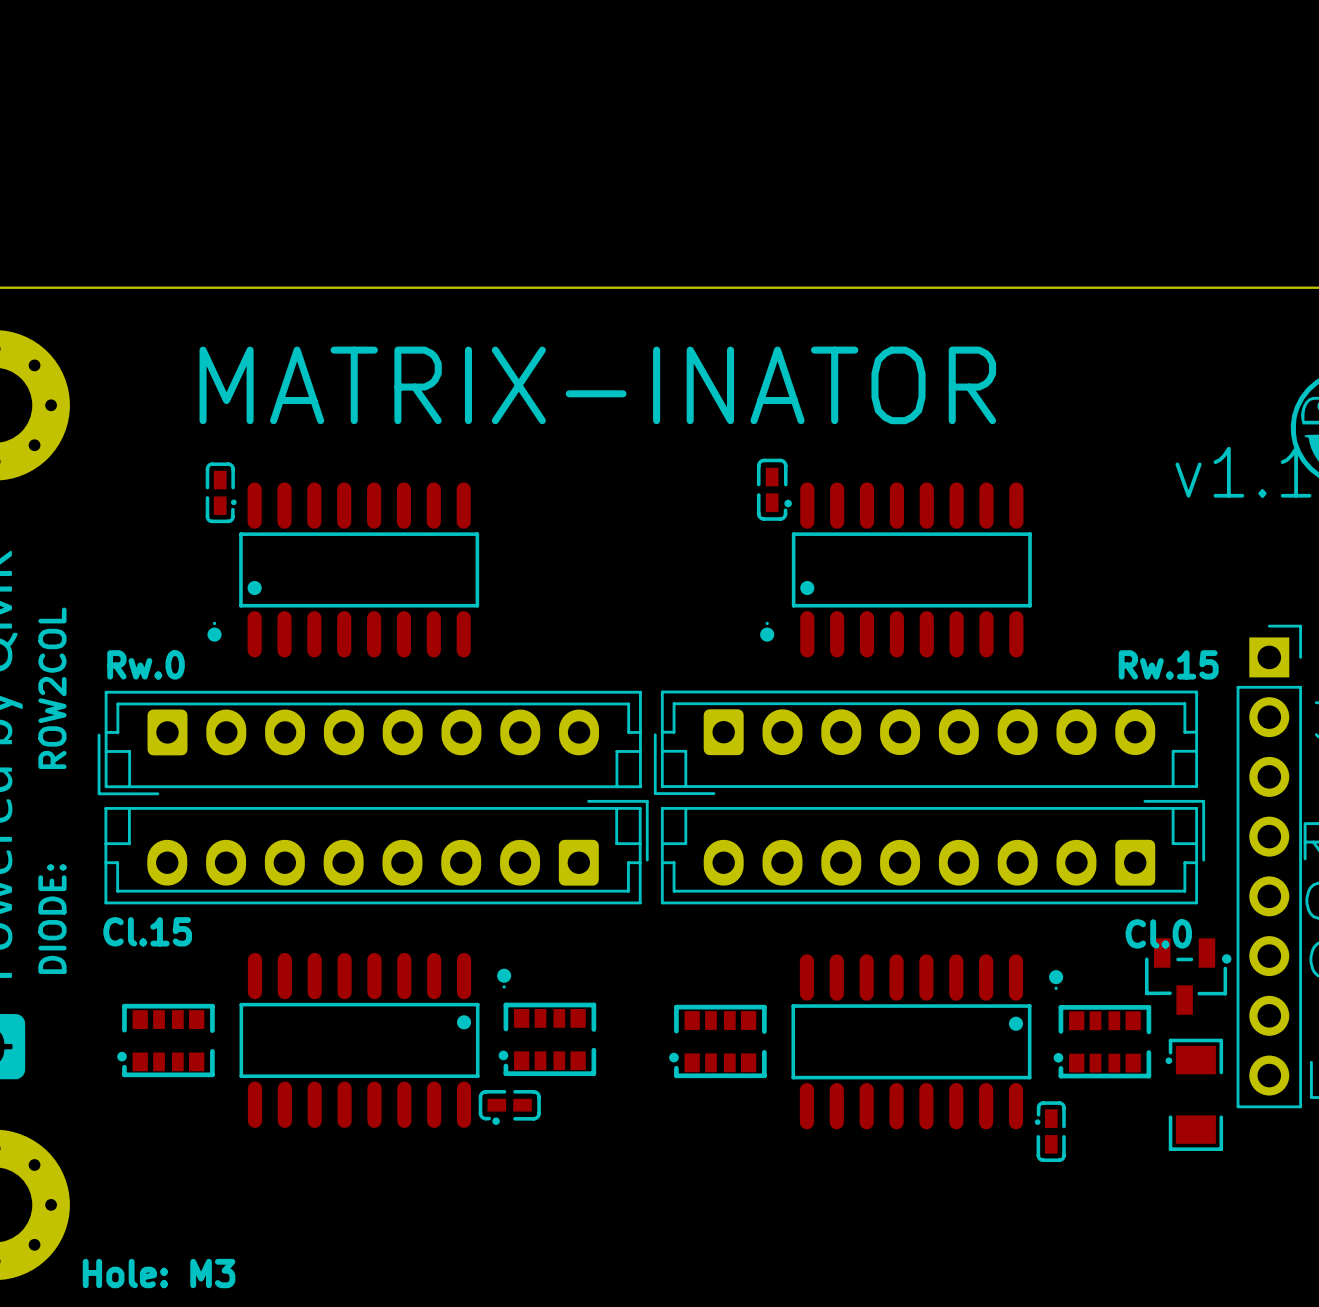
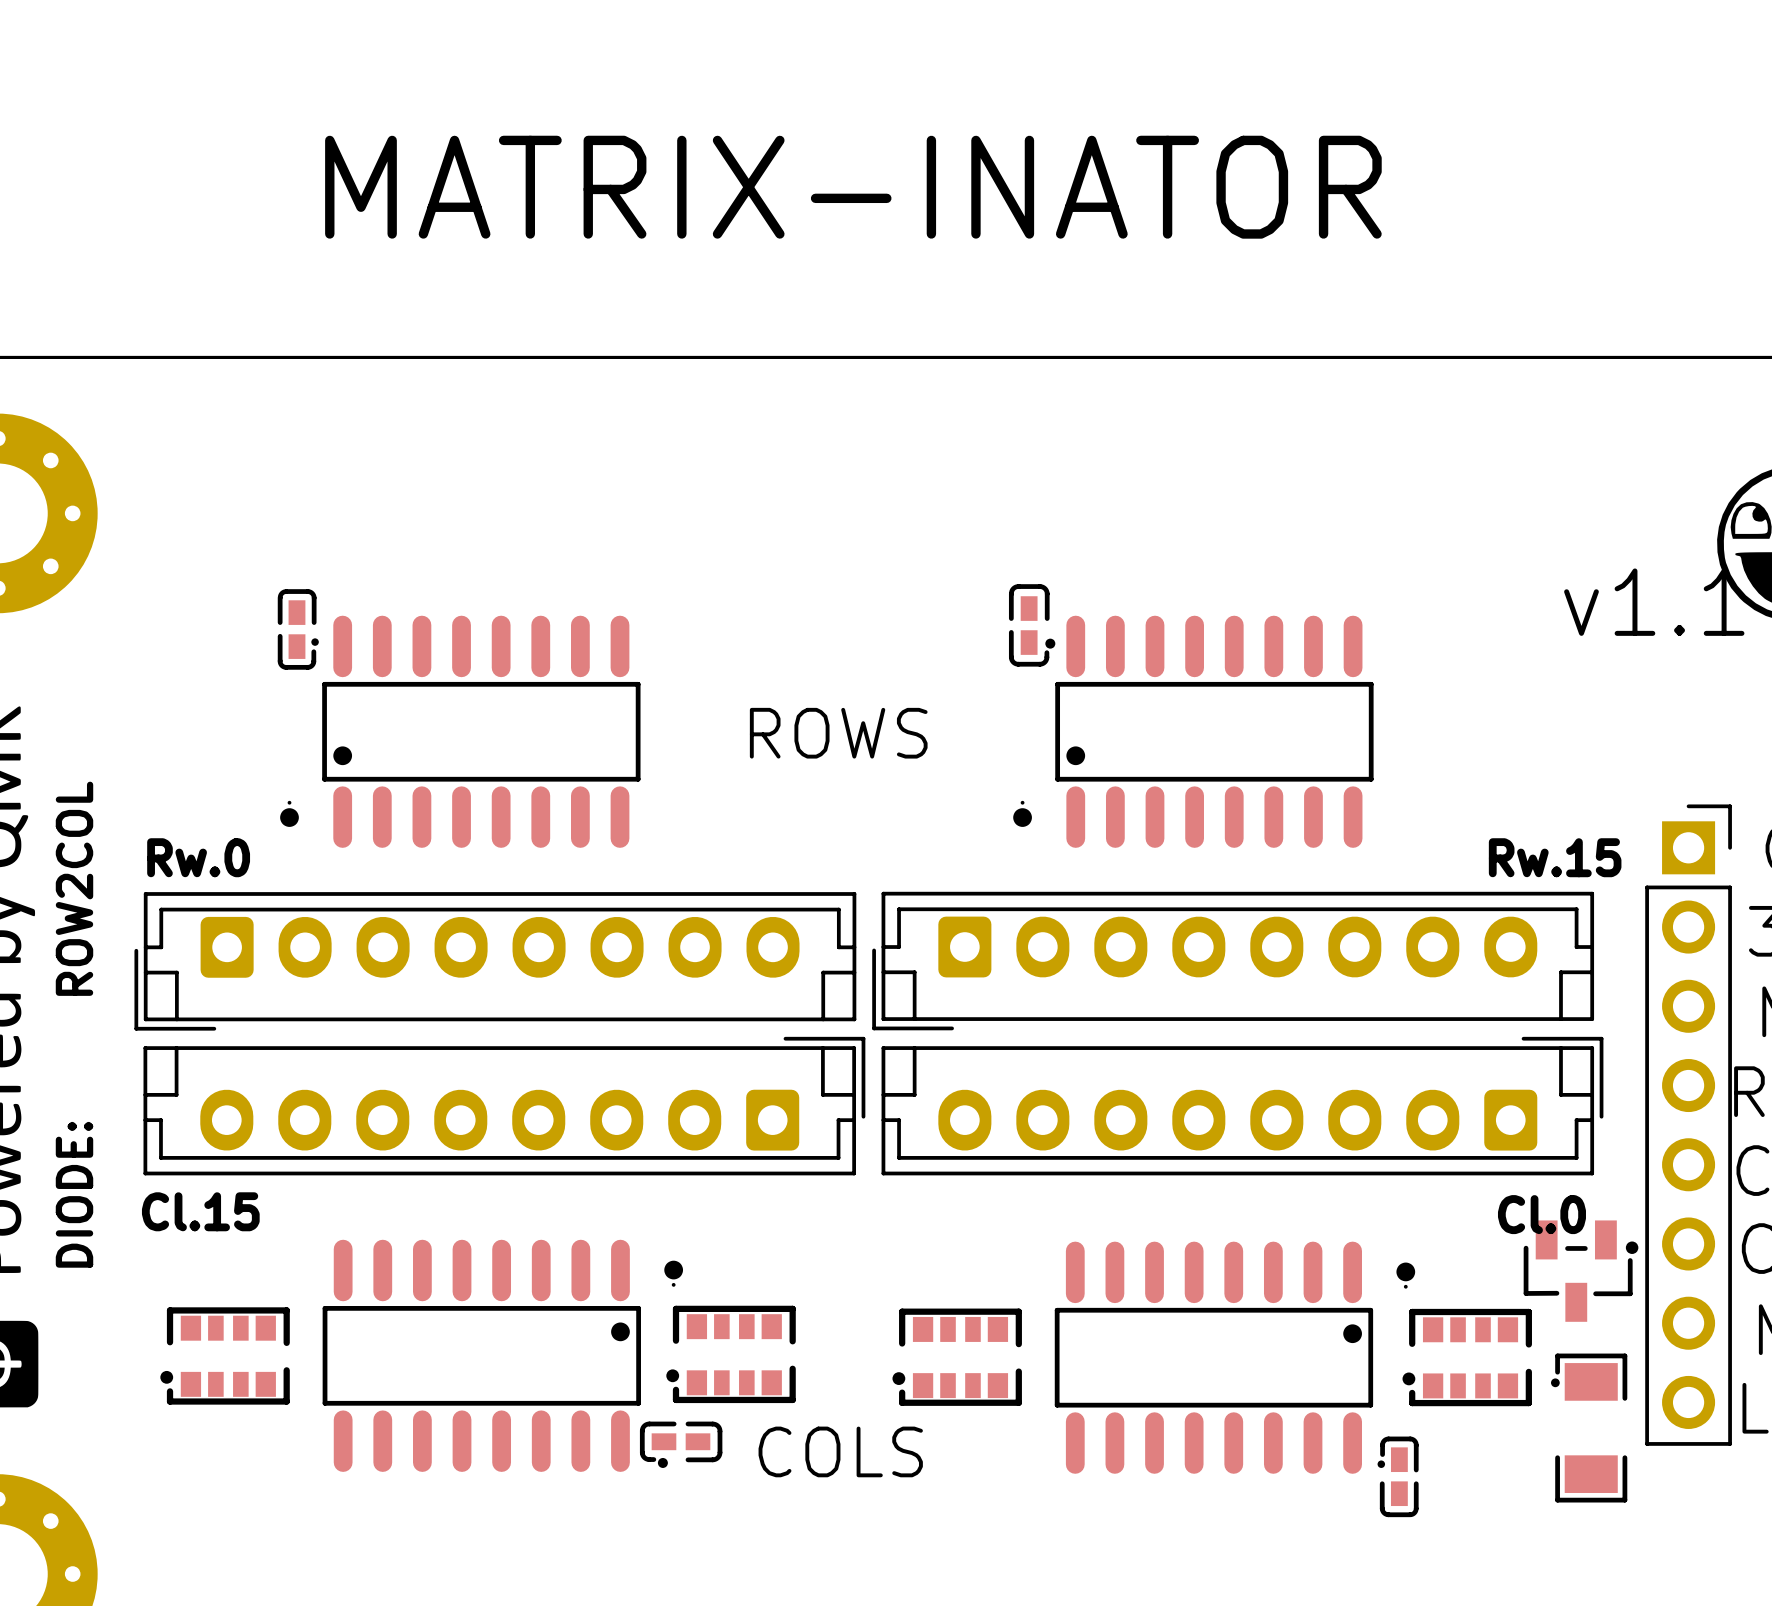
text position: MATRIX-INATOR (597, 385) -> MATRIX-INATOR (853, 187)
text: none -> ROWS (838, 733)
text: none -> COLS (840, 1451)

